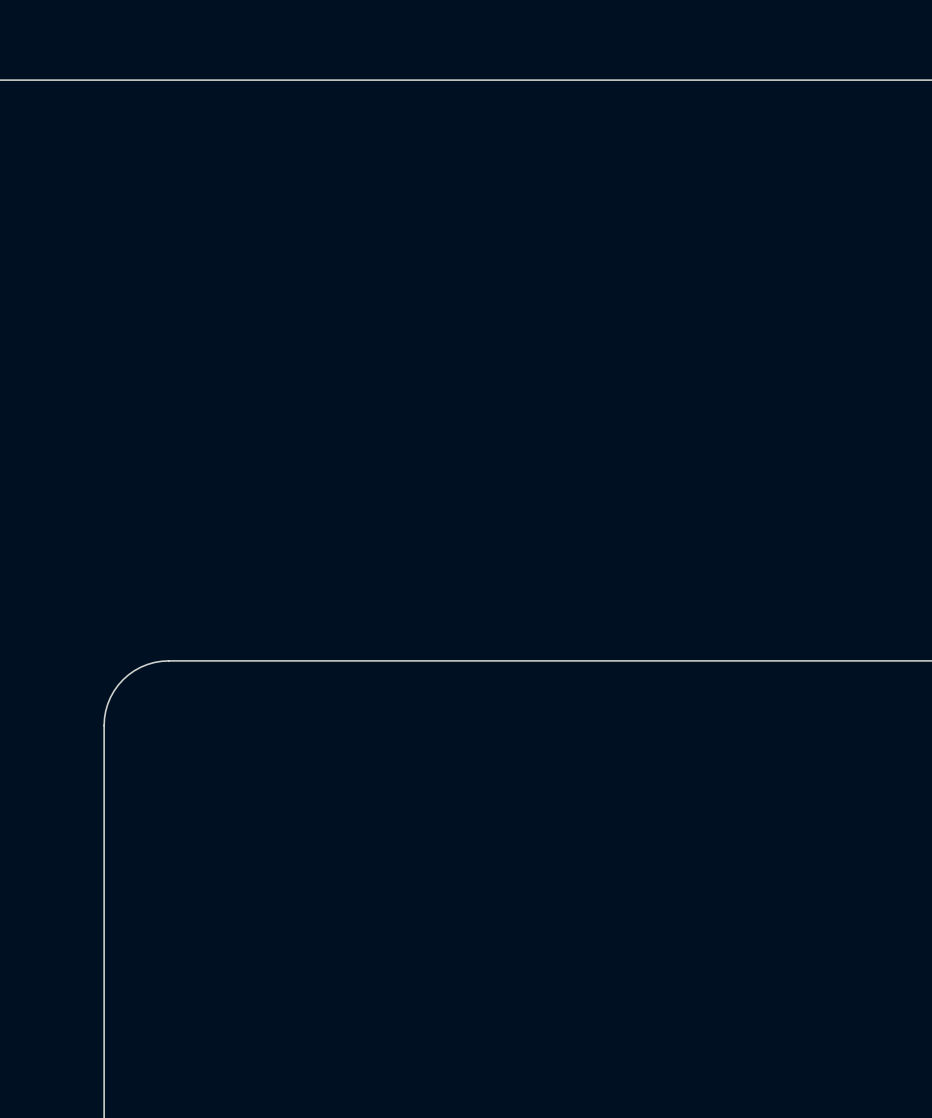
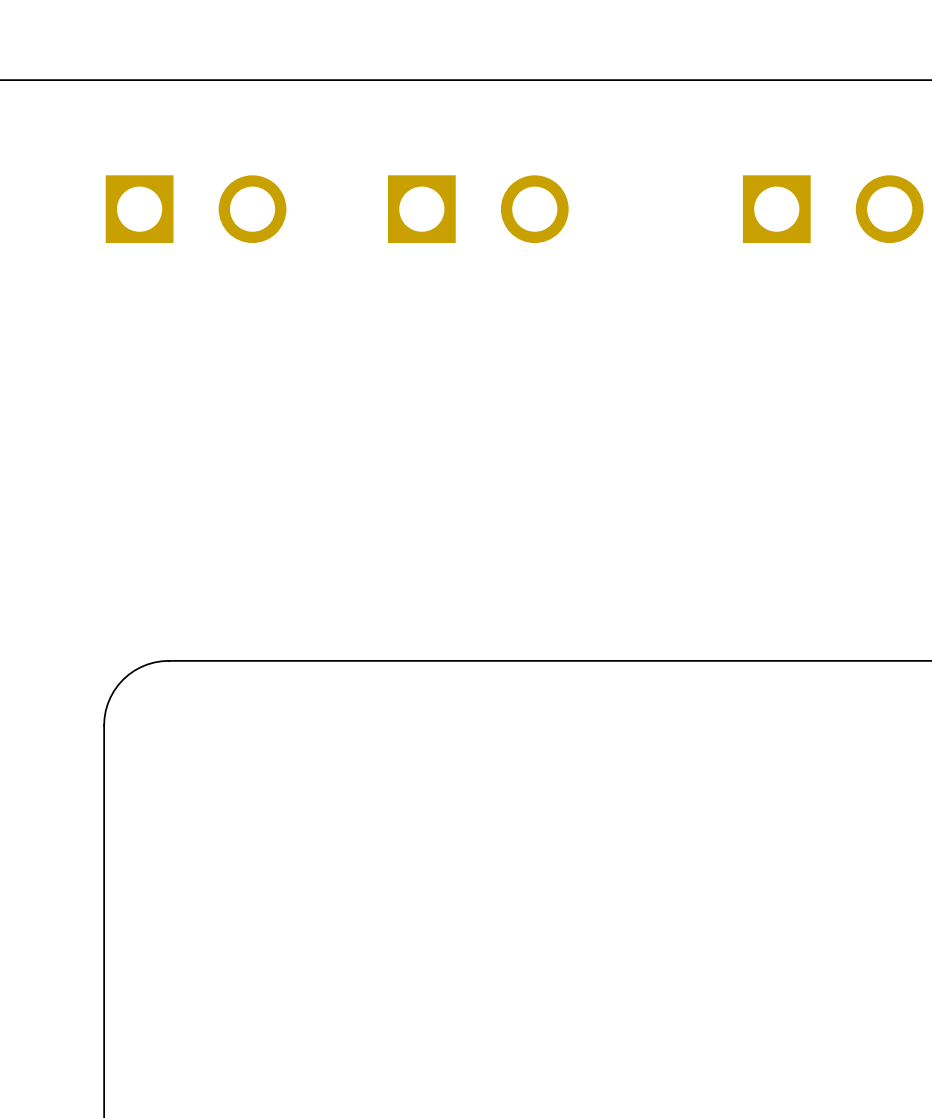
part: none -> (196, 209)
part: none -> (478, 209)
part: none -> (833, 209)

